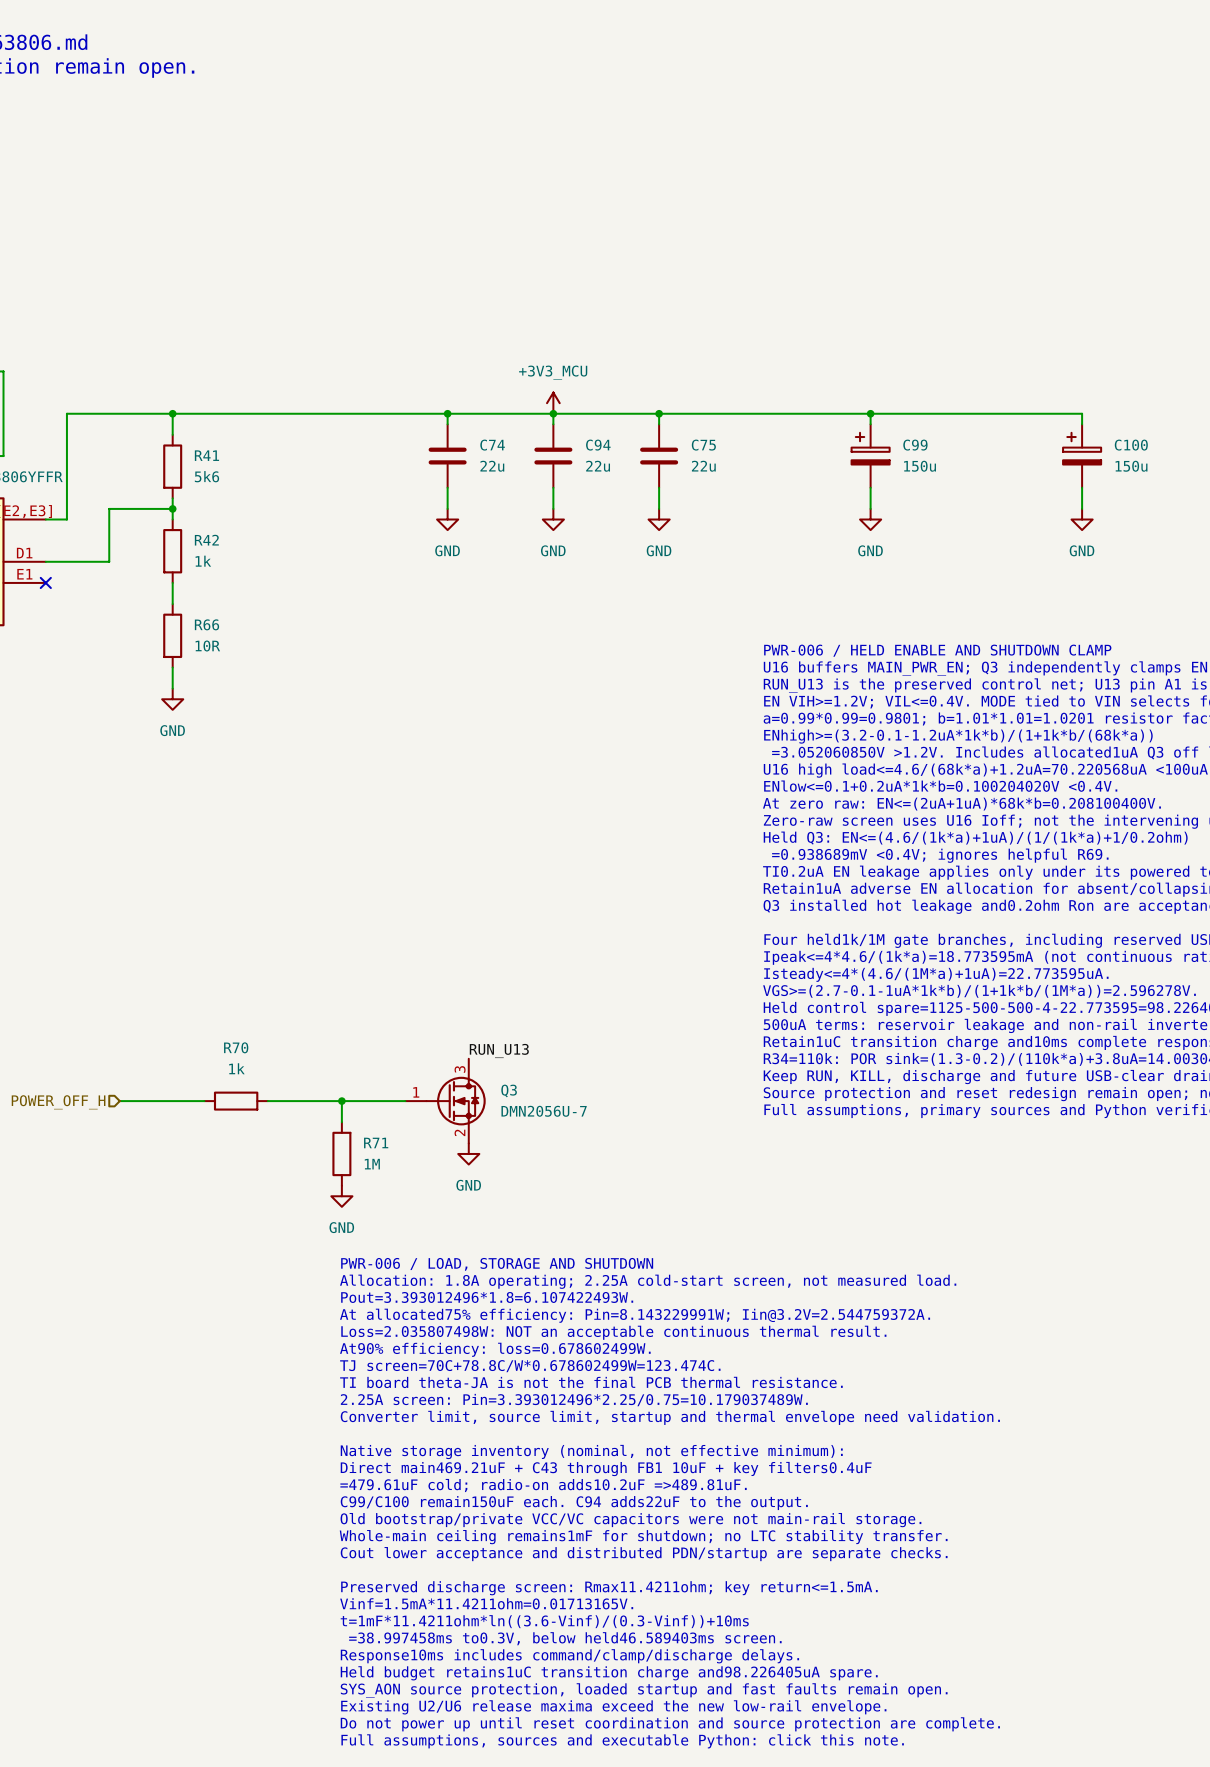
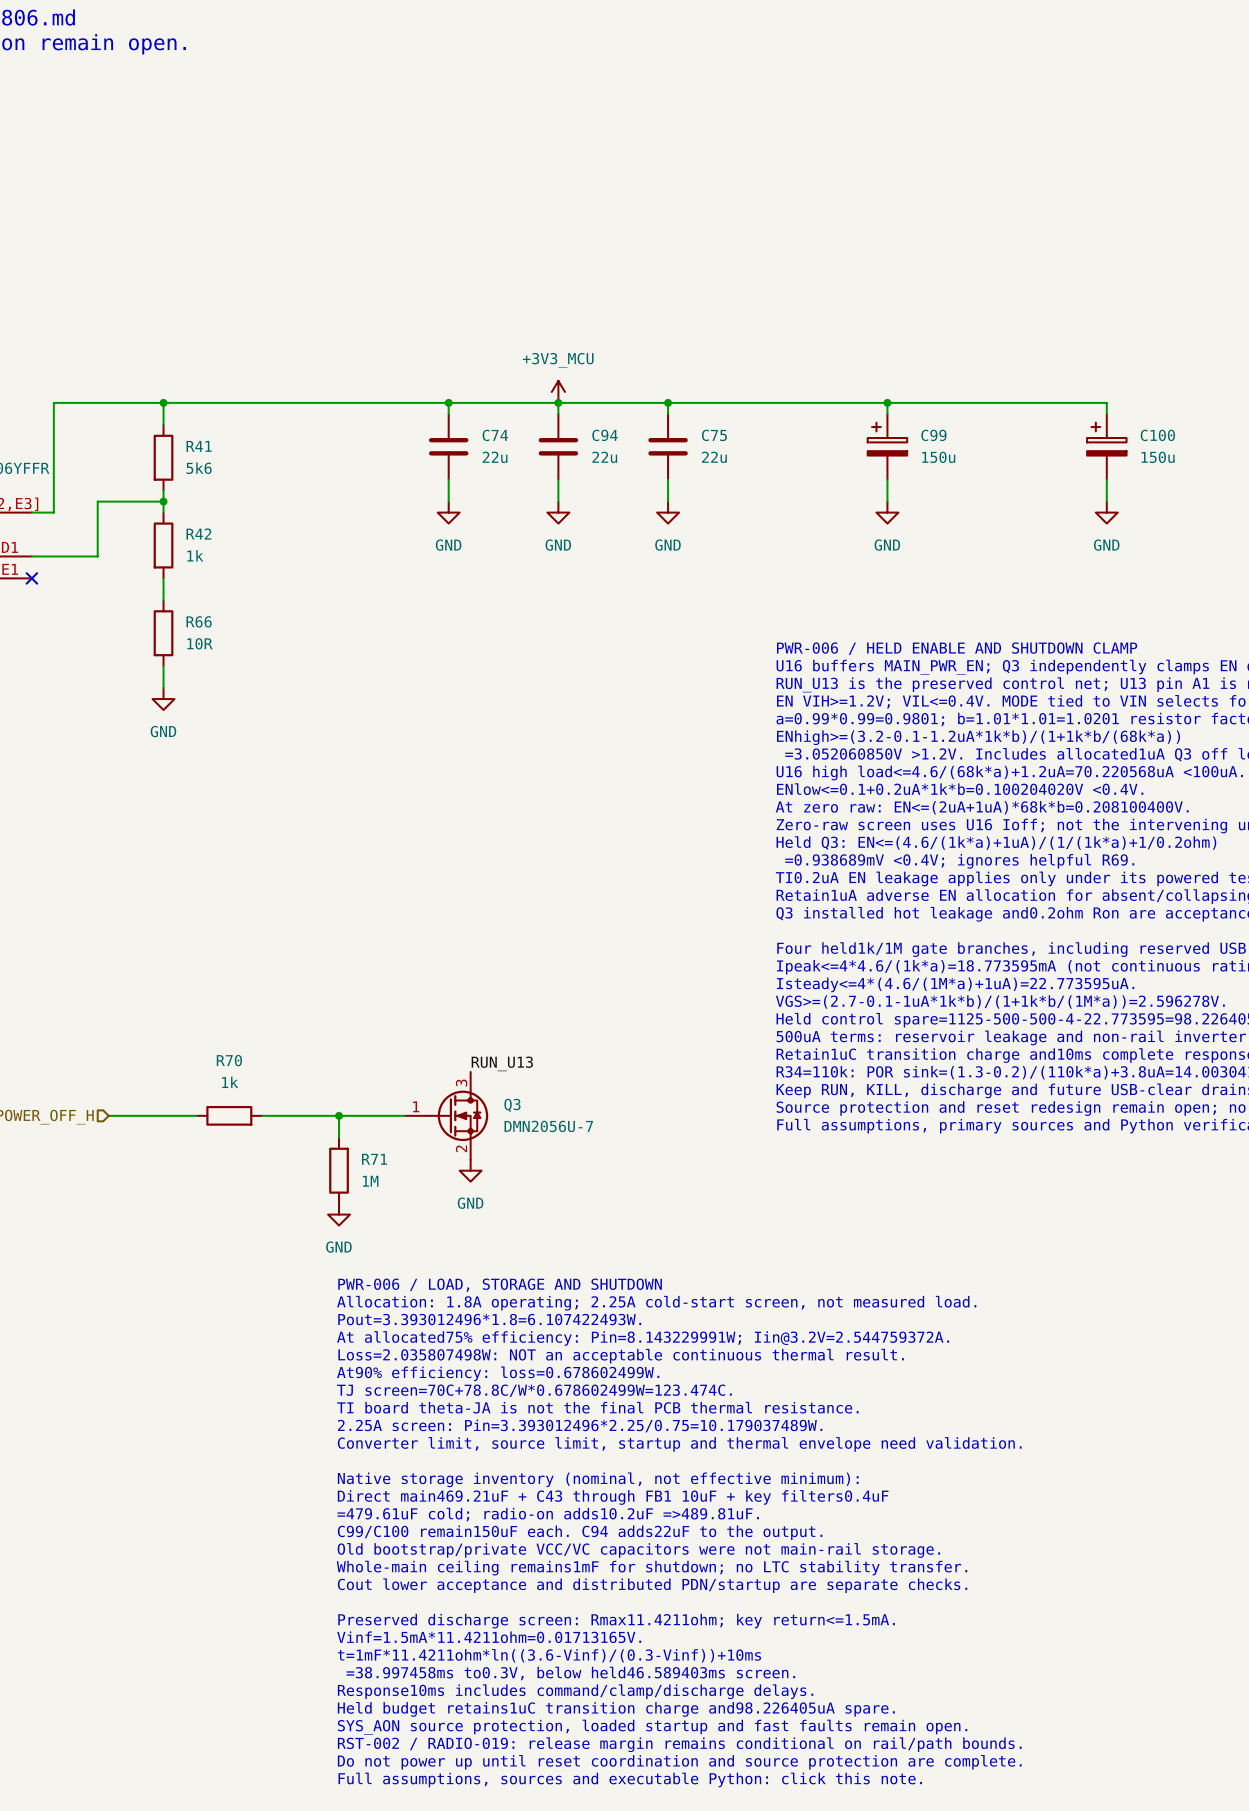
text: Existing U2/U6 release maxima exceed the new low-rail envelope. (613, 1707) -> RST-002 / RADIO-019: release margin remains conditional on rail/path bounds. (679, 1744)

